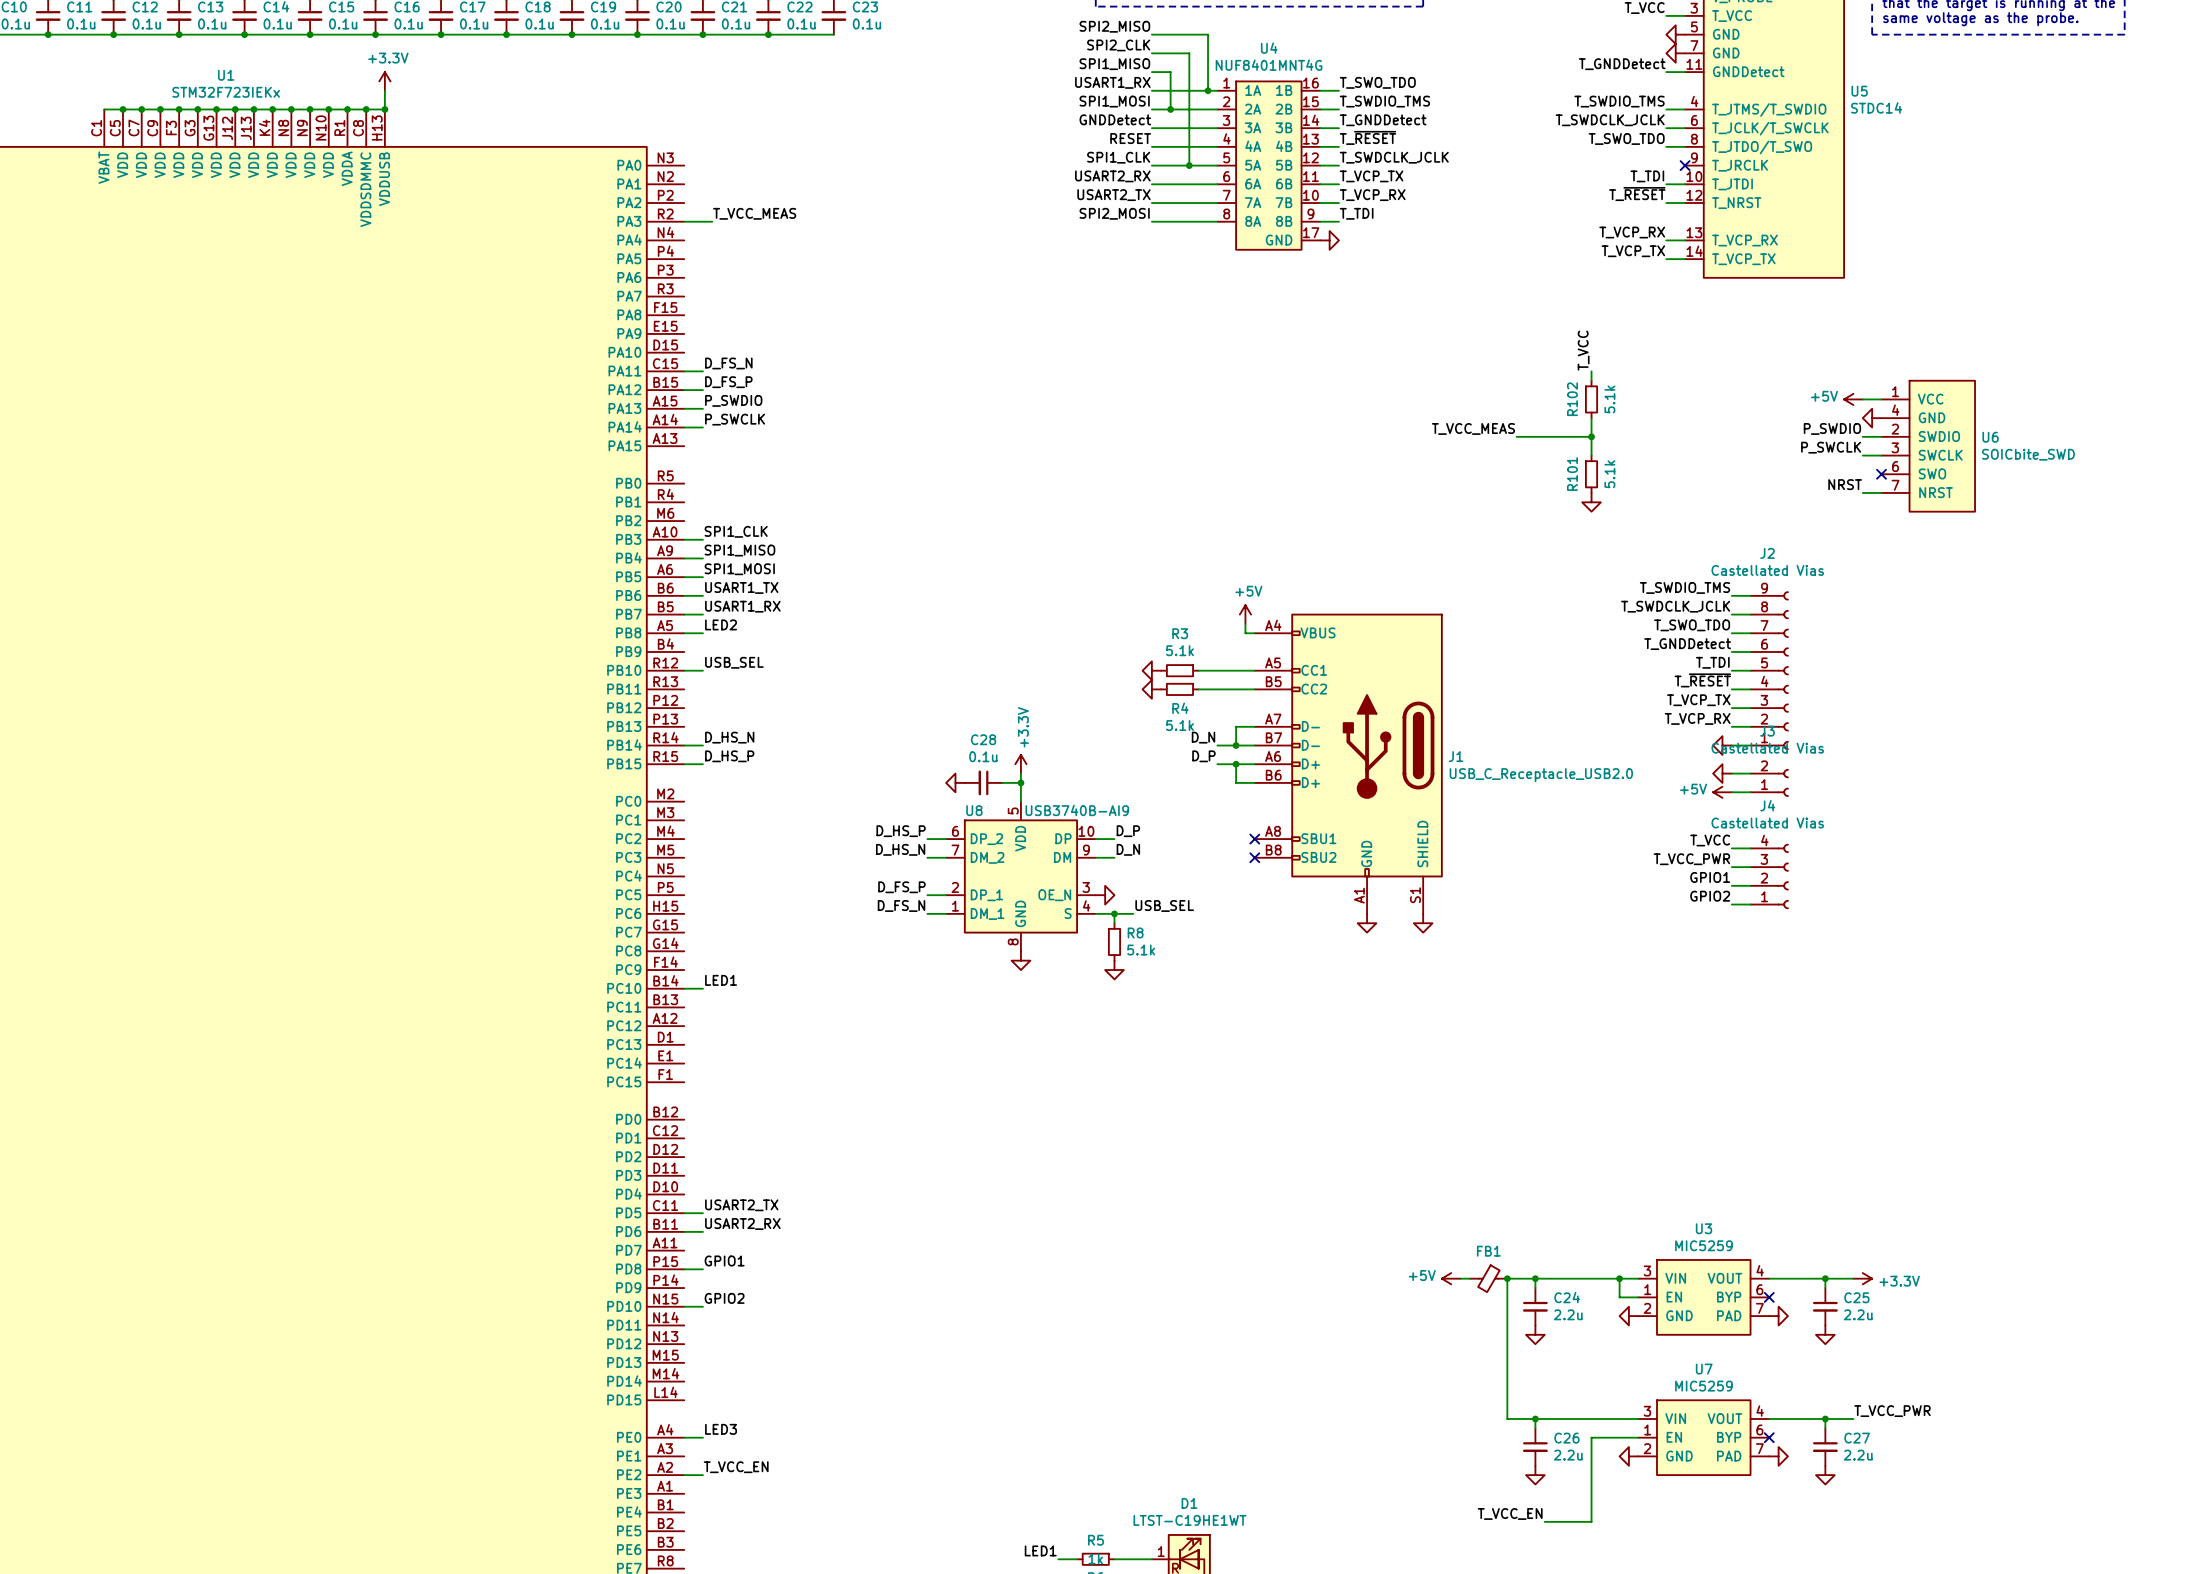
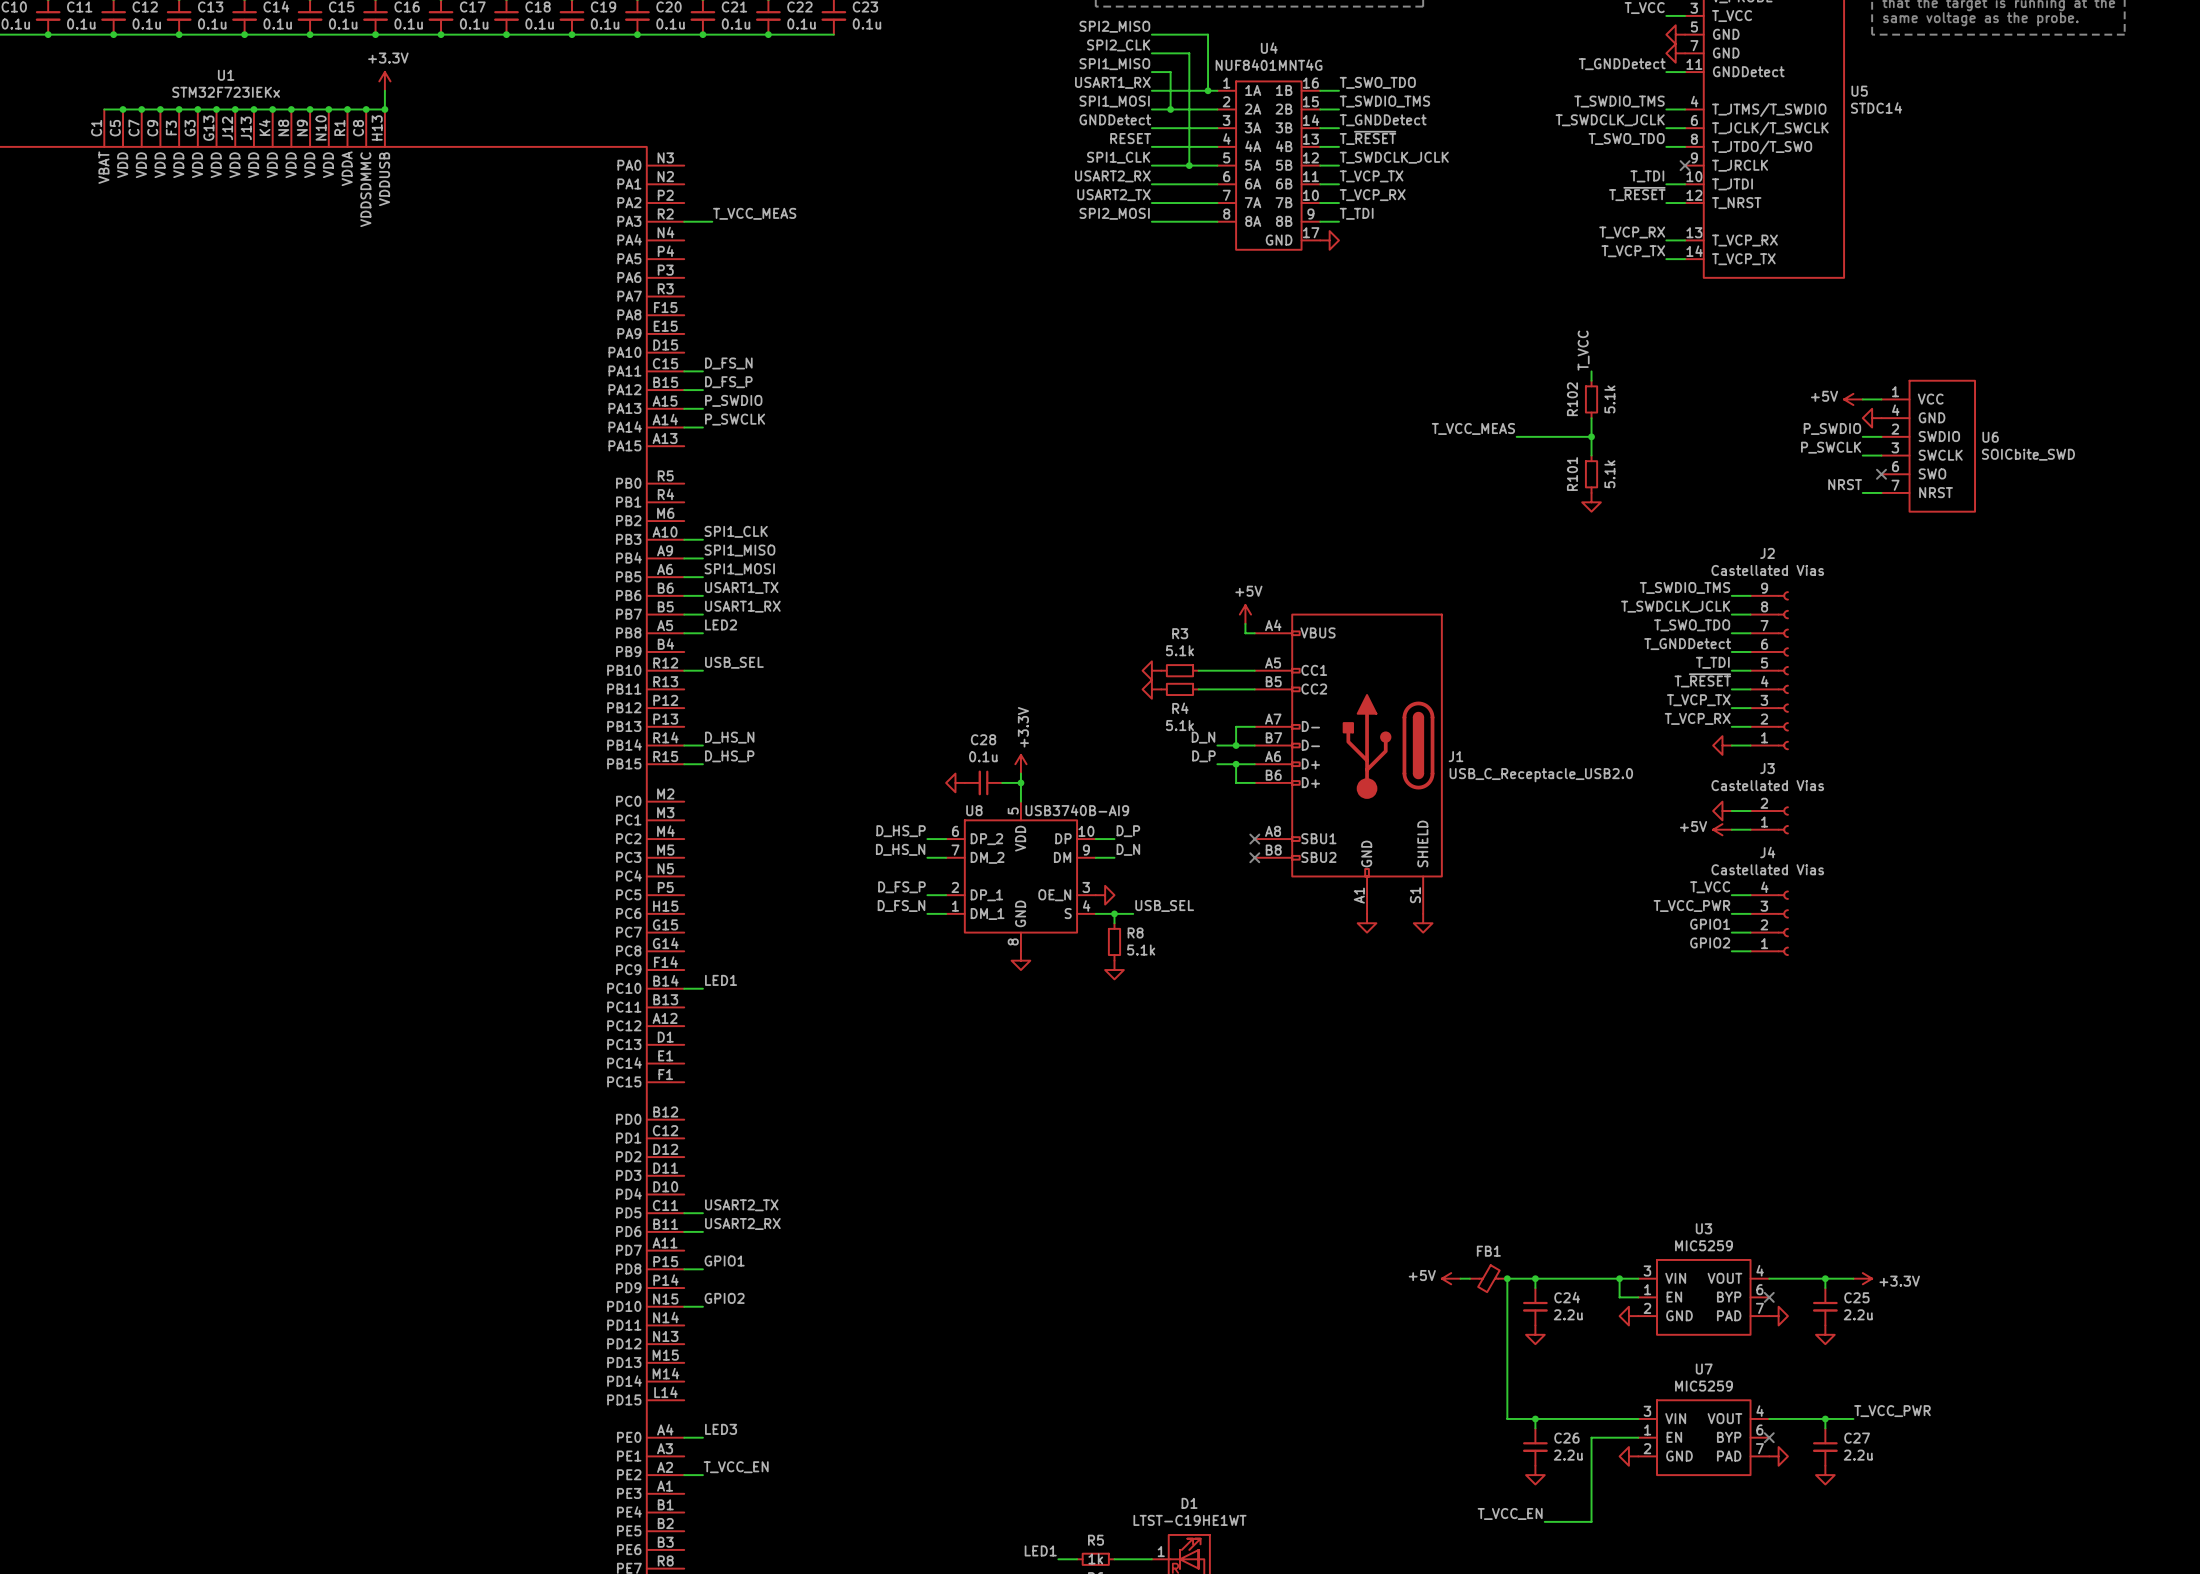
power symbol position: (1722, 773) -> (1722, 811)
wire: (1731, 773) (1750, 773) -> (1731, 811) (1750, 811)
J3 position: (1769, 782) -> (1769, 820)
power symbol position: +5V (1722, 792) -> +5V (1722, 829)
wire: (1731, 792) (1750, 792) -> (1731, 829) (1750, 829)
label position: T_VCC (1710, 840) -> T_VCC (1710, 887)
wire: (1731, 848) (1750, 848) -> (1731, 895) (1750, 895)
label position: T_VCC_PWR (1691, 859) -> T_VCC_PWR (1691, 905)
wire: (1731, 867) (1750, 867) -> (1731, 913) (1750, 913)
J4 position: (1769, 876) -> (1769, 923)
label position: GPIO1 (1710, 877) -> GPIO1 (1710, 924)
wire: (1731, 885) (1750, 885) -> (1731, 932) (1750, 932)
label position: GPIO2 (1710, 896) -> GPIO2 (1710, 942)
wire: (1731, 904) (1750, 904) -> (1731, 951) (1750, 951)

